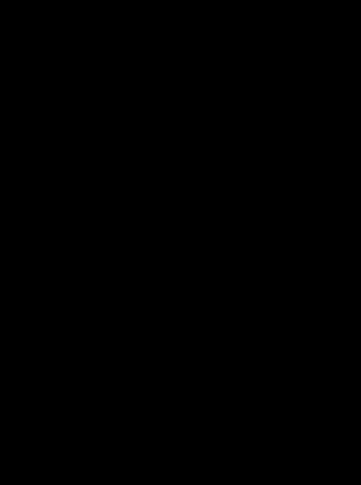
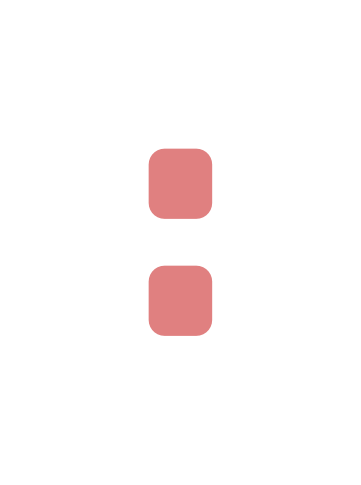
part: none -> (180, 242)

